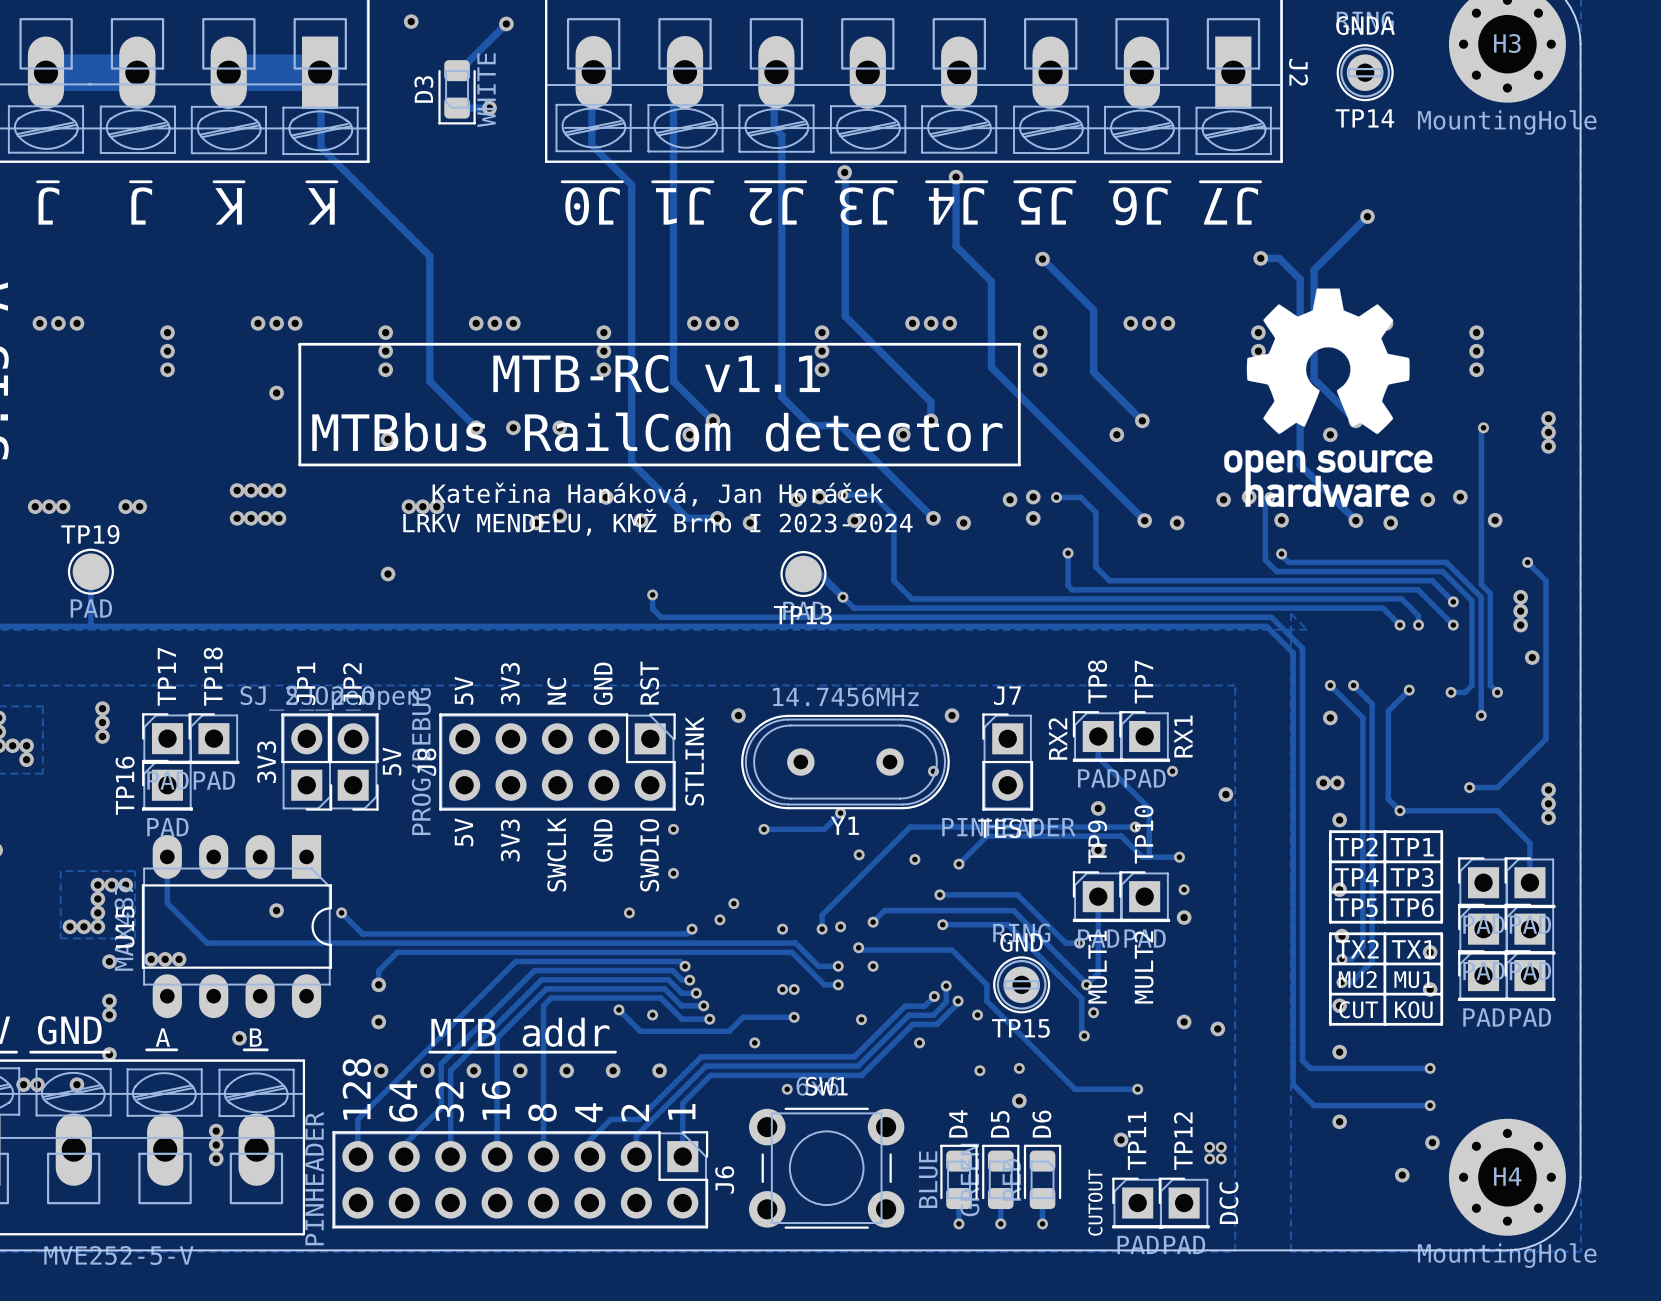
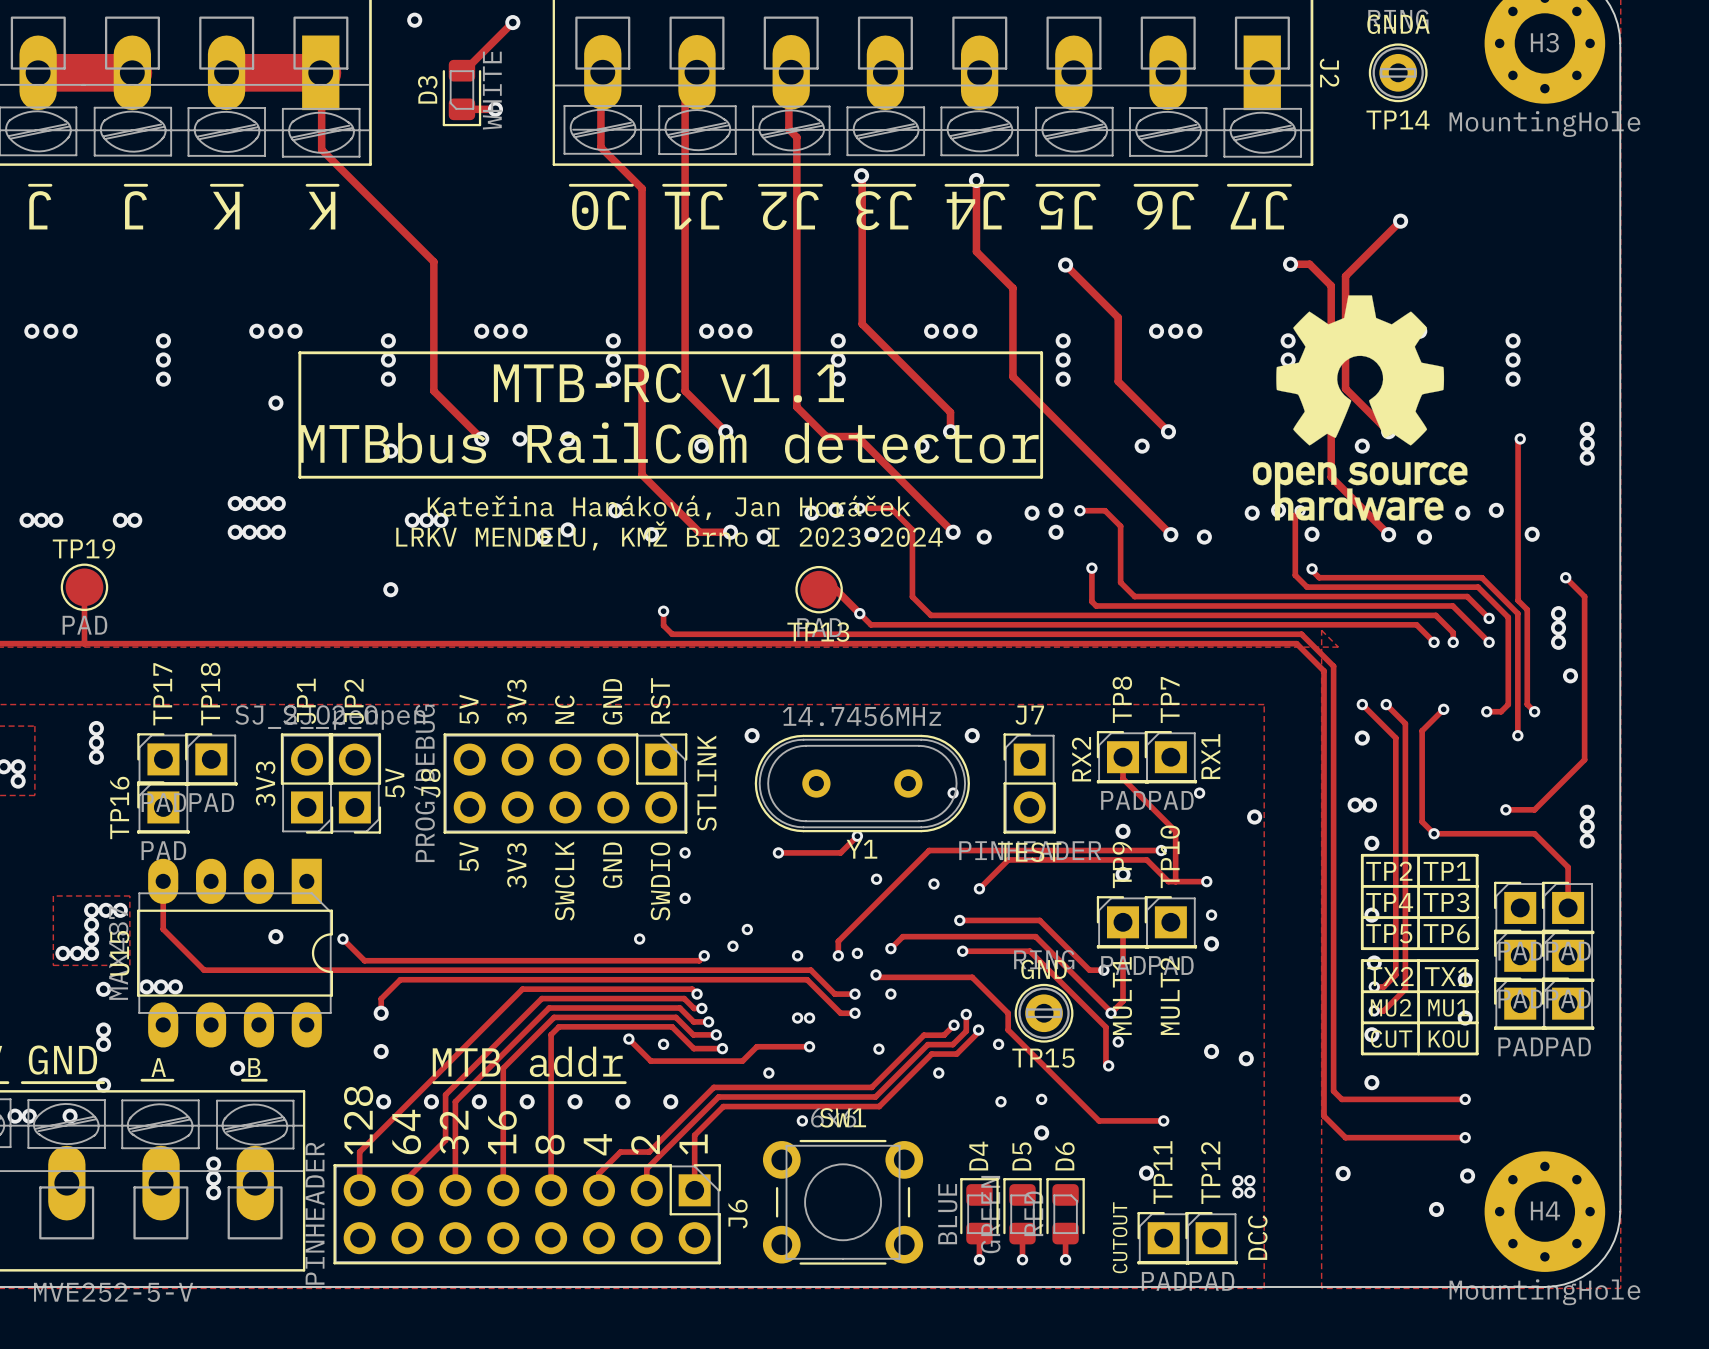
via position: (1339, 1121) -> (1343, 1173)

